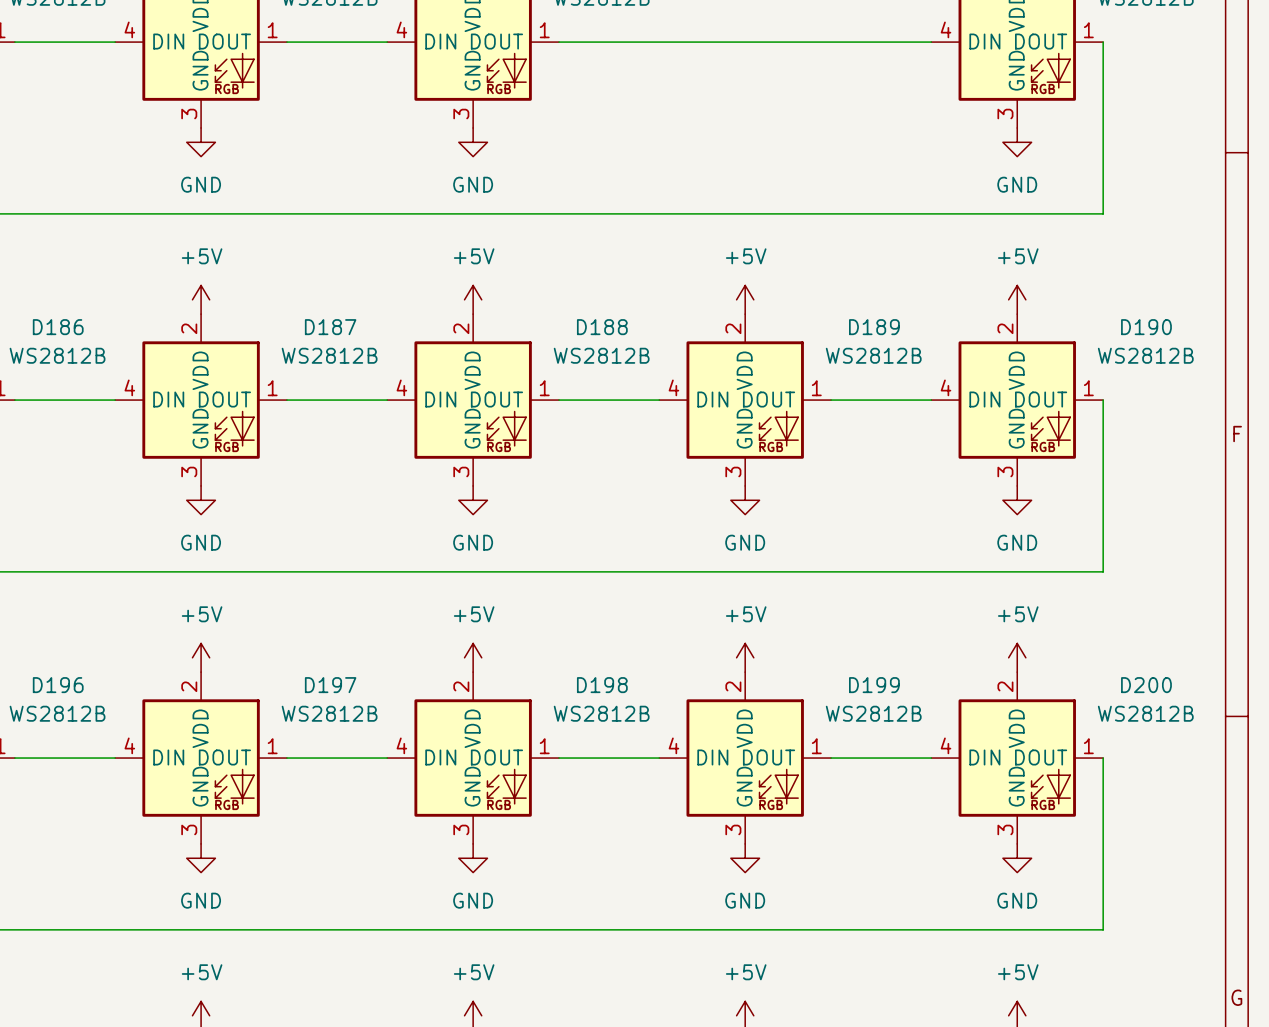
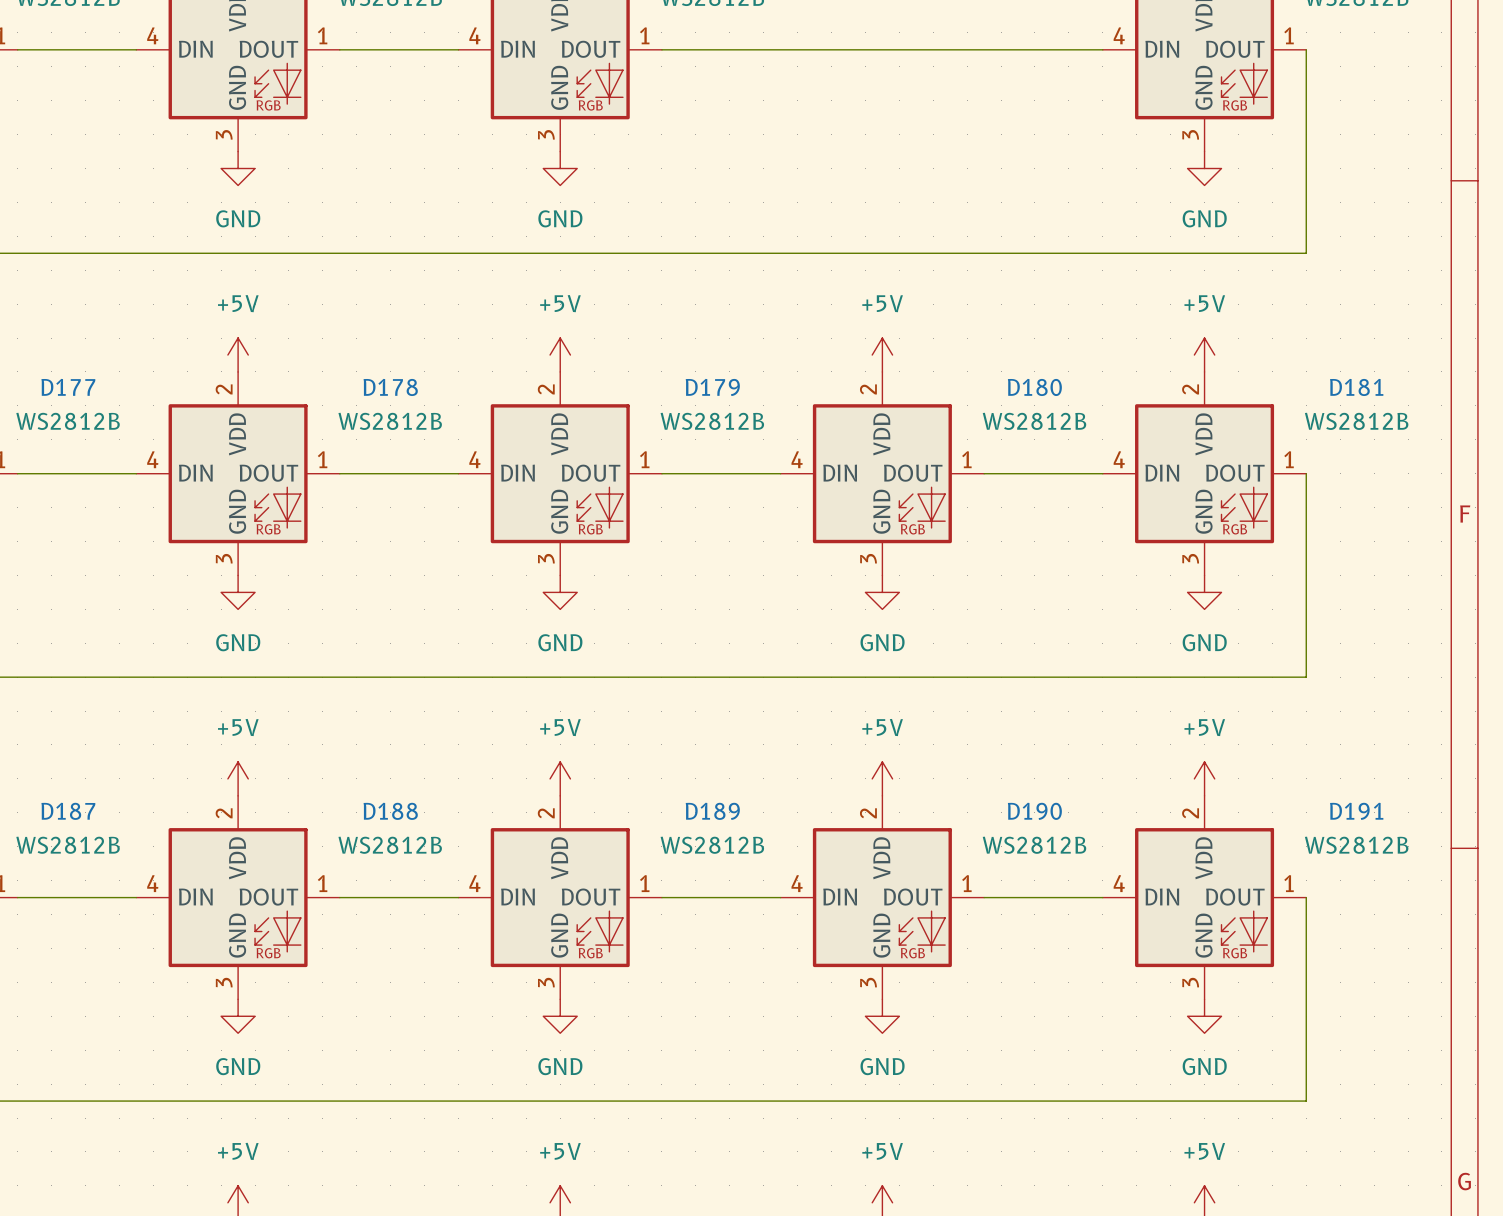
D186 name: D186 (58, 327) -> D177 (68, 387)
D187 name: D187 (330, 327) -> D178 (390, 387)
D188 name: D188 (602, 327) -> D179 (712, 387)
D189 name: D189 (874, 327) -> D180 (1034, 387)
D190 name: D190 (1146, 327) -> D181 (1356, 387)
D196 name: D196 (58, 685) -> D187 (68, 811)
D197 name: D197 (330, 685) -> D188 (390, 811)
D198 name: D198 (602, 685) -> D189 (712, 811)
D199 name: D199 (874, 685) -> D190 (1034, 811)
D200 name: D200 (1146, 685) -> D191 (1356, 811)

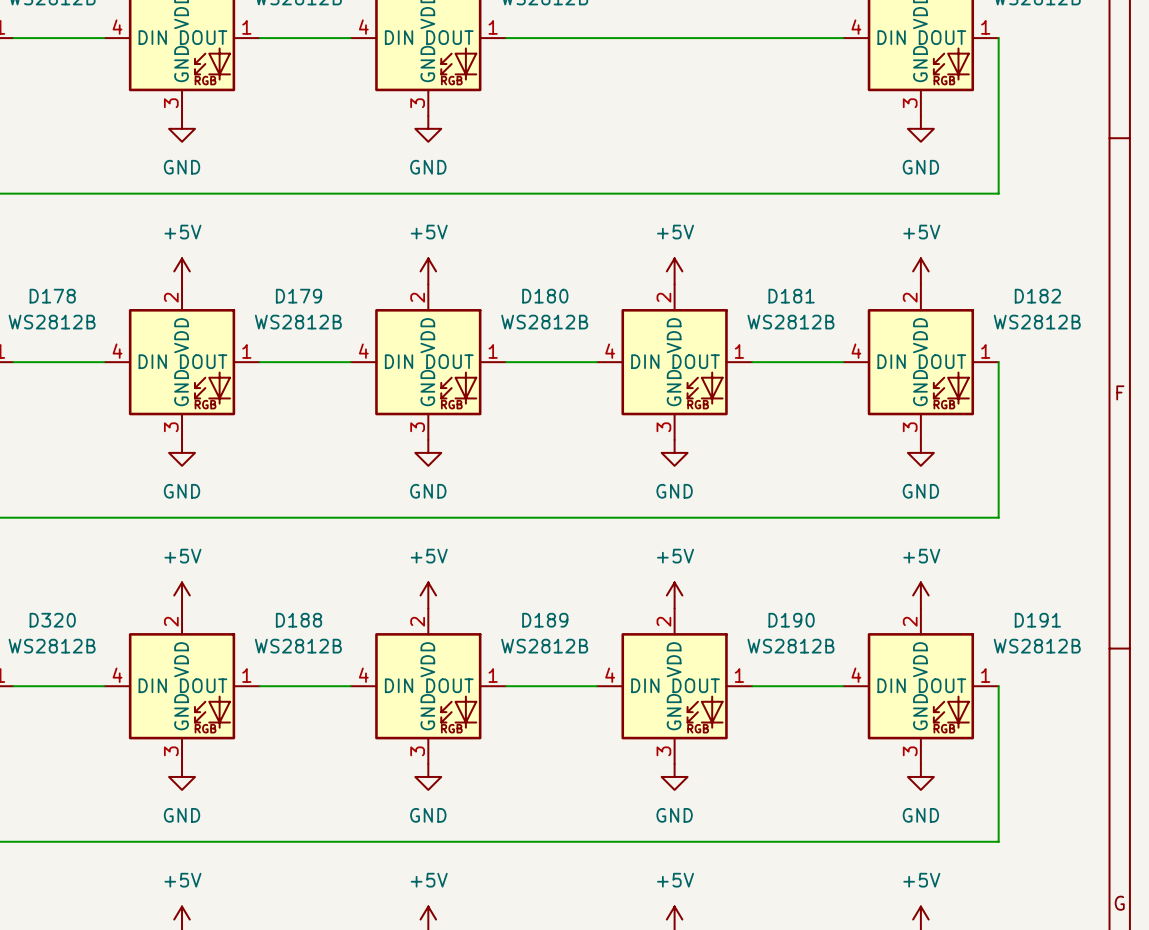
D177 name: D177 (68, 387) -> D178 (52, 296)
D178 name: D178 (390, 387) -> D179 (298, 296)
D179 name: D179 (712, 387) -> D180 (545, 296)
D180 name: D180 (1034, 387) -> D181 (791, 296)
D181 name: D181 (1356, 387) -> D182 (1037, 296)
D187 name: D187 (68, 811) -> D320 (52, 620)

